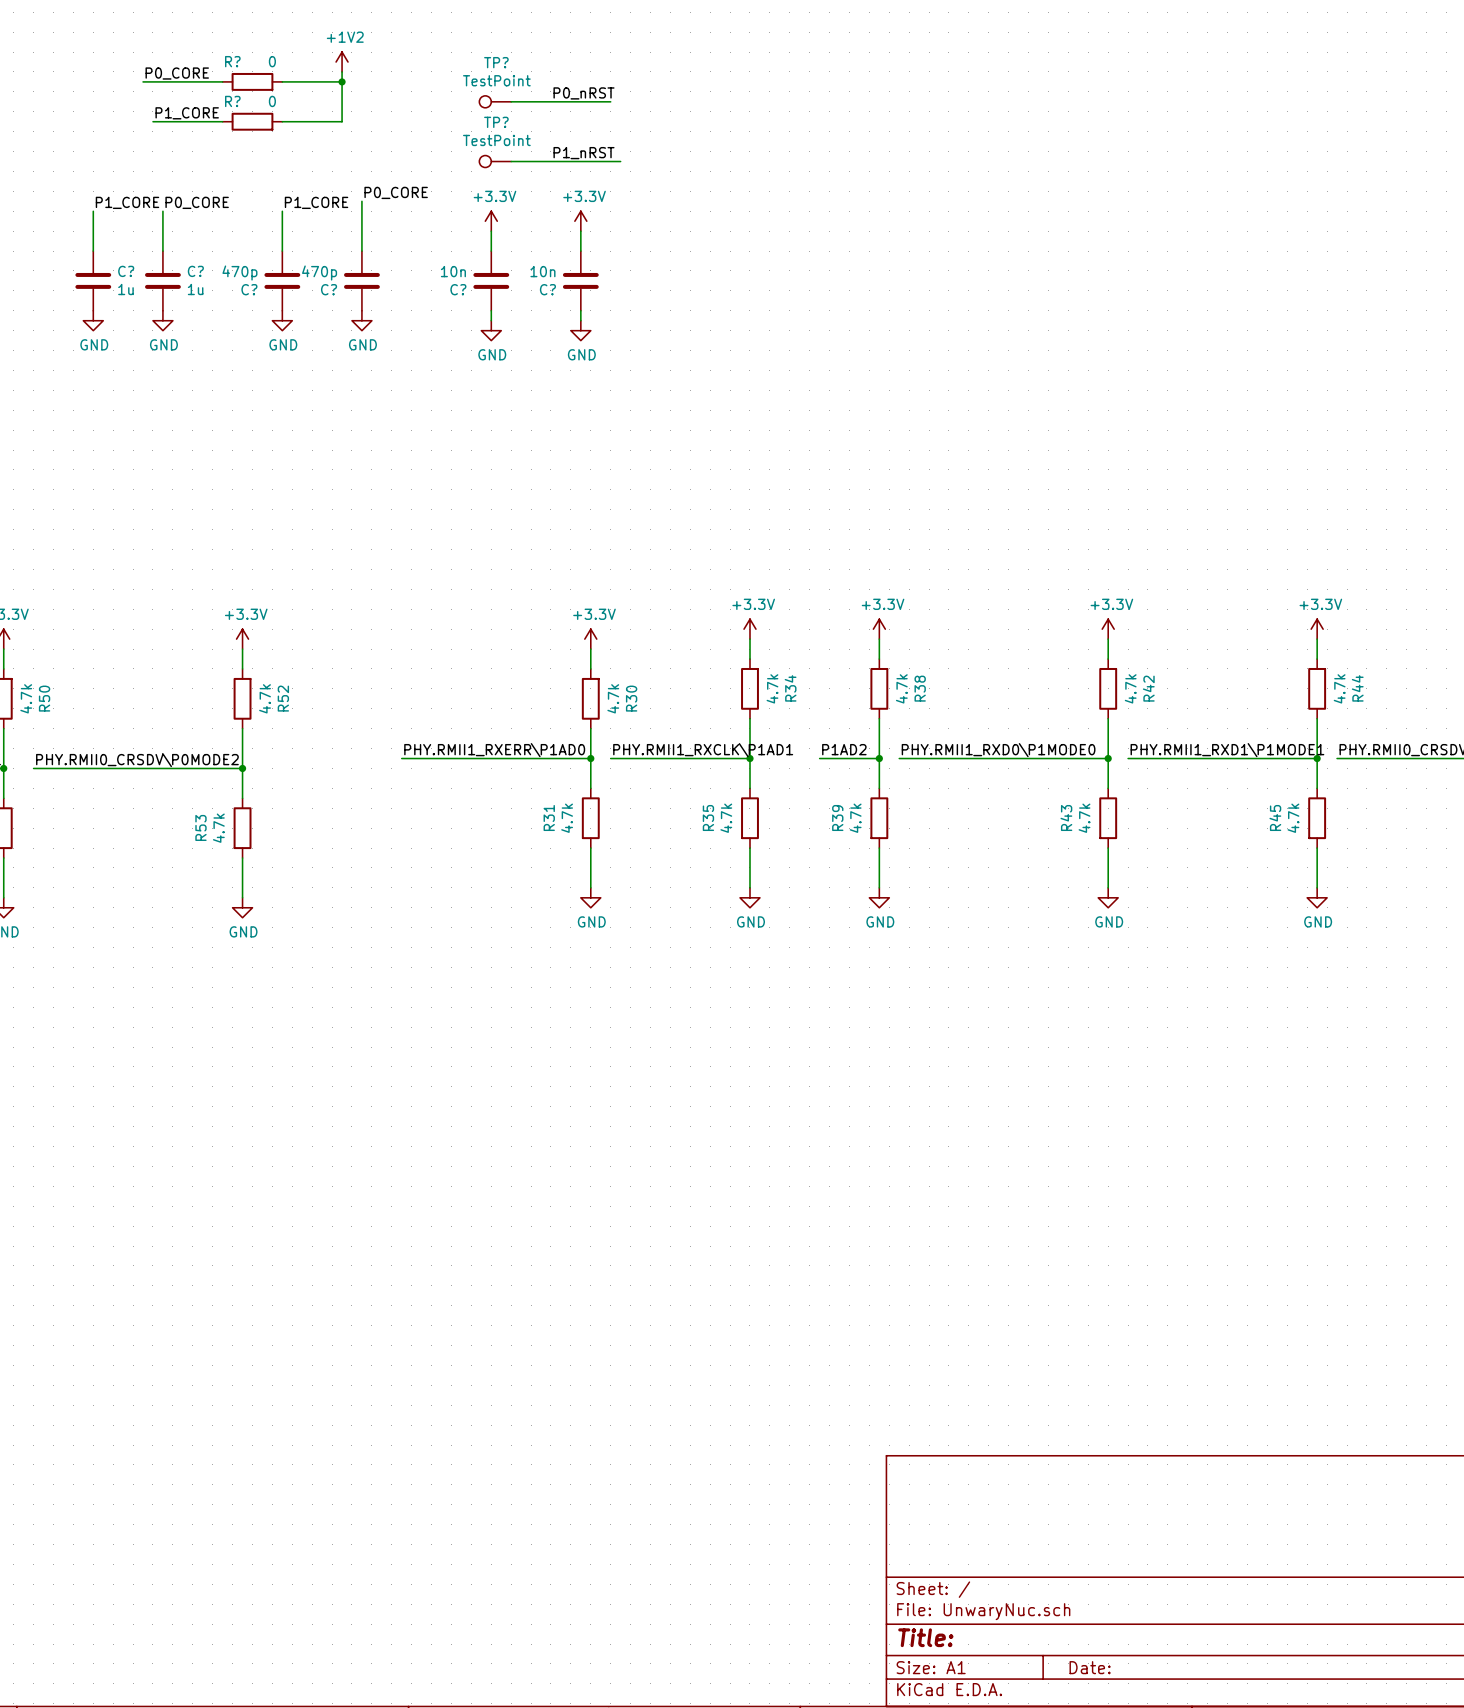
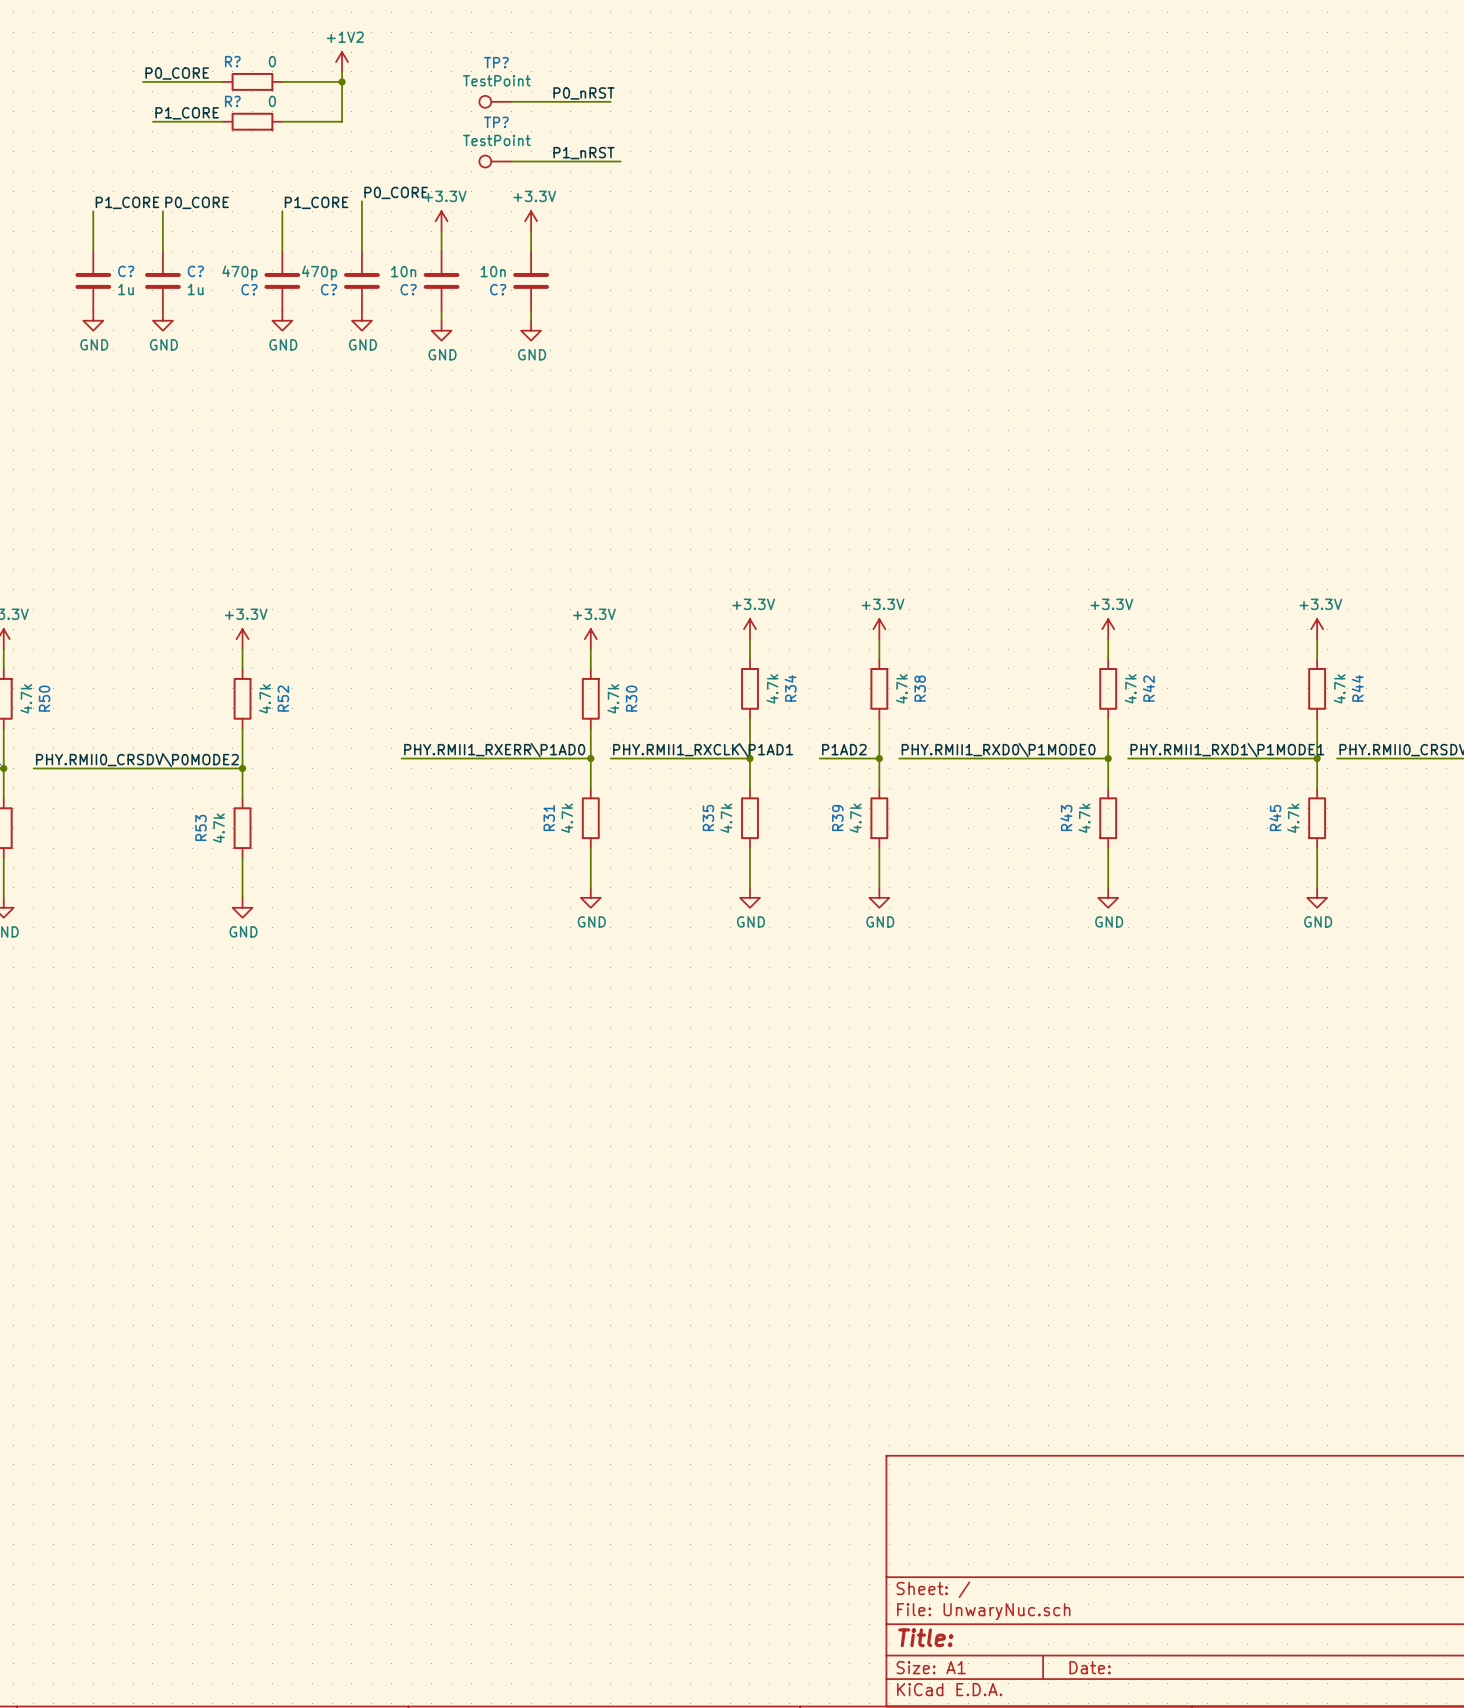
power symbol: none -> +3.3V (441, 221)
power symbol: +3.3V (491, 221) -> none
power symbol: none -> +3.3V (531, 221)
power symbol: +3.3V (580, 221) -> none
wire: (491, 231) (491, 251) -> (441, 231) (441, 251)
wire: (580, 231) (580, 251) -> (531, 231) (531, 251)
C?: none -> 10n (441, 280)
C?: 10n (491, 280) -> none
C?: none -> 10n (531, 280)
C?: 10n (580, 280) -> none
wire: (491, 310) (491, 320) -> (441, 310) (441, 320)
wire: (580, 310) (580, 320) -> (531, 310) (531, 320)
power symbol: none -> GND (441, 330)
power symbol: GND (491, 330) -> none
power symbol: none -> GND (531, 330)
power symbol: GND (580, 330) -> none

